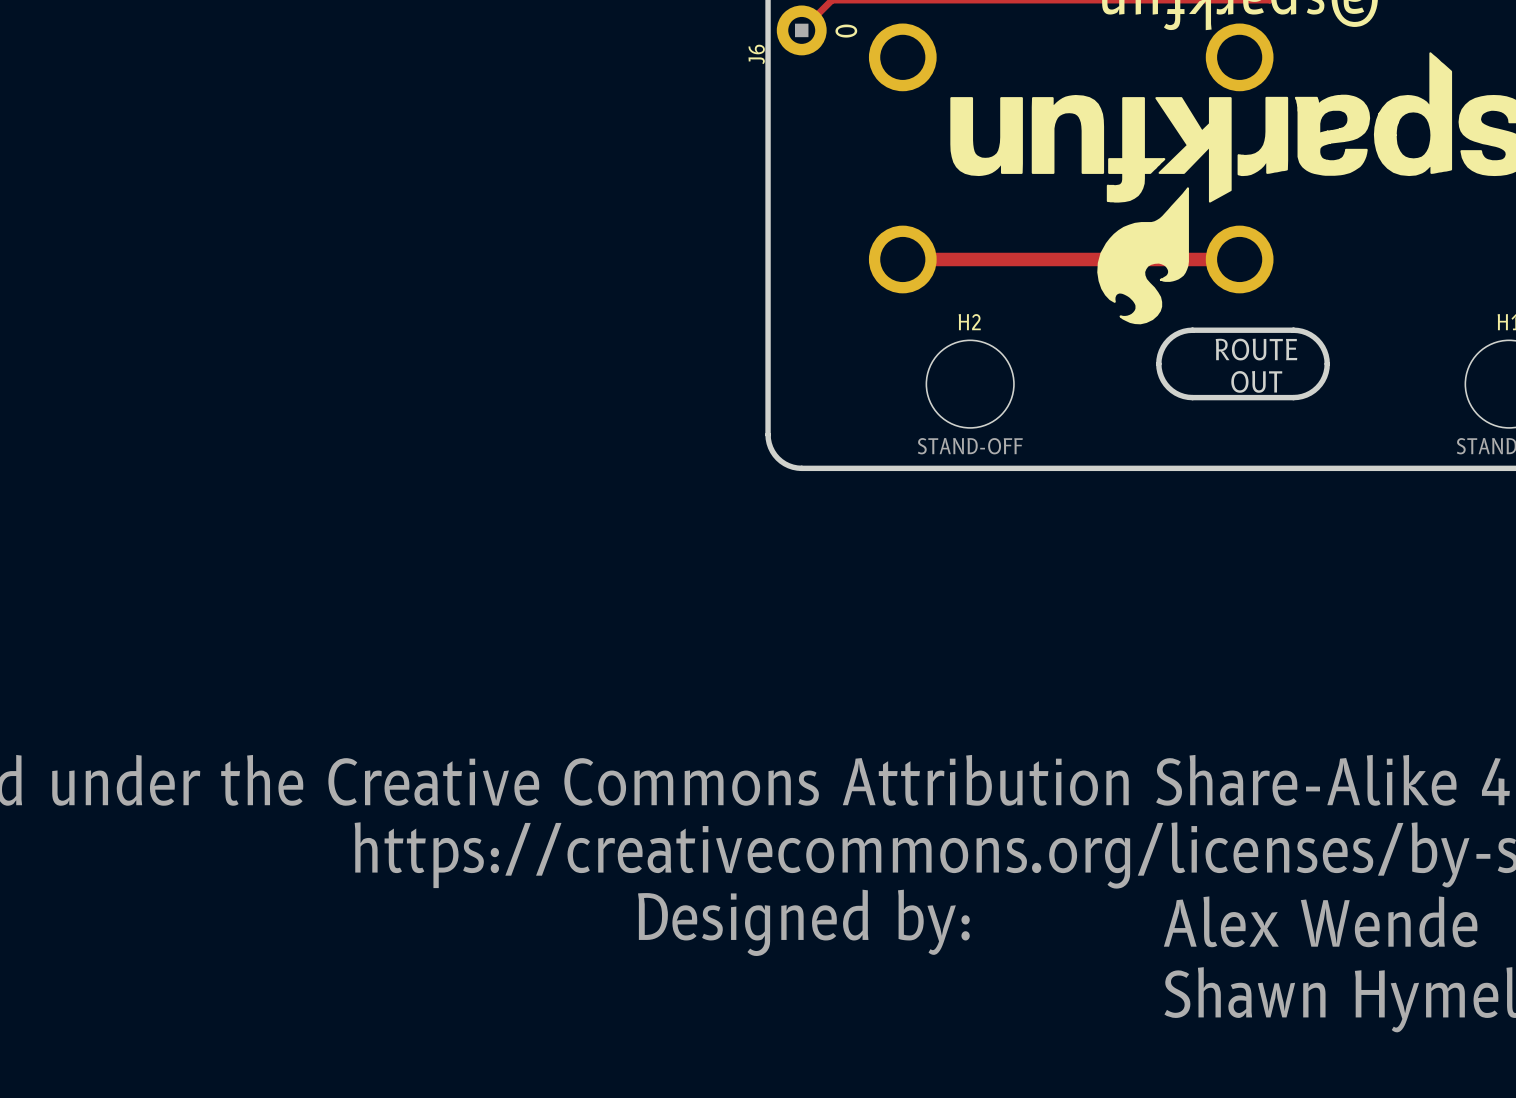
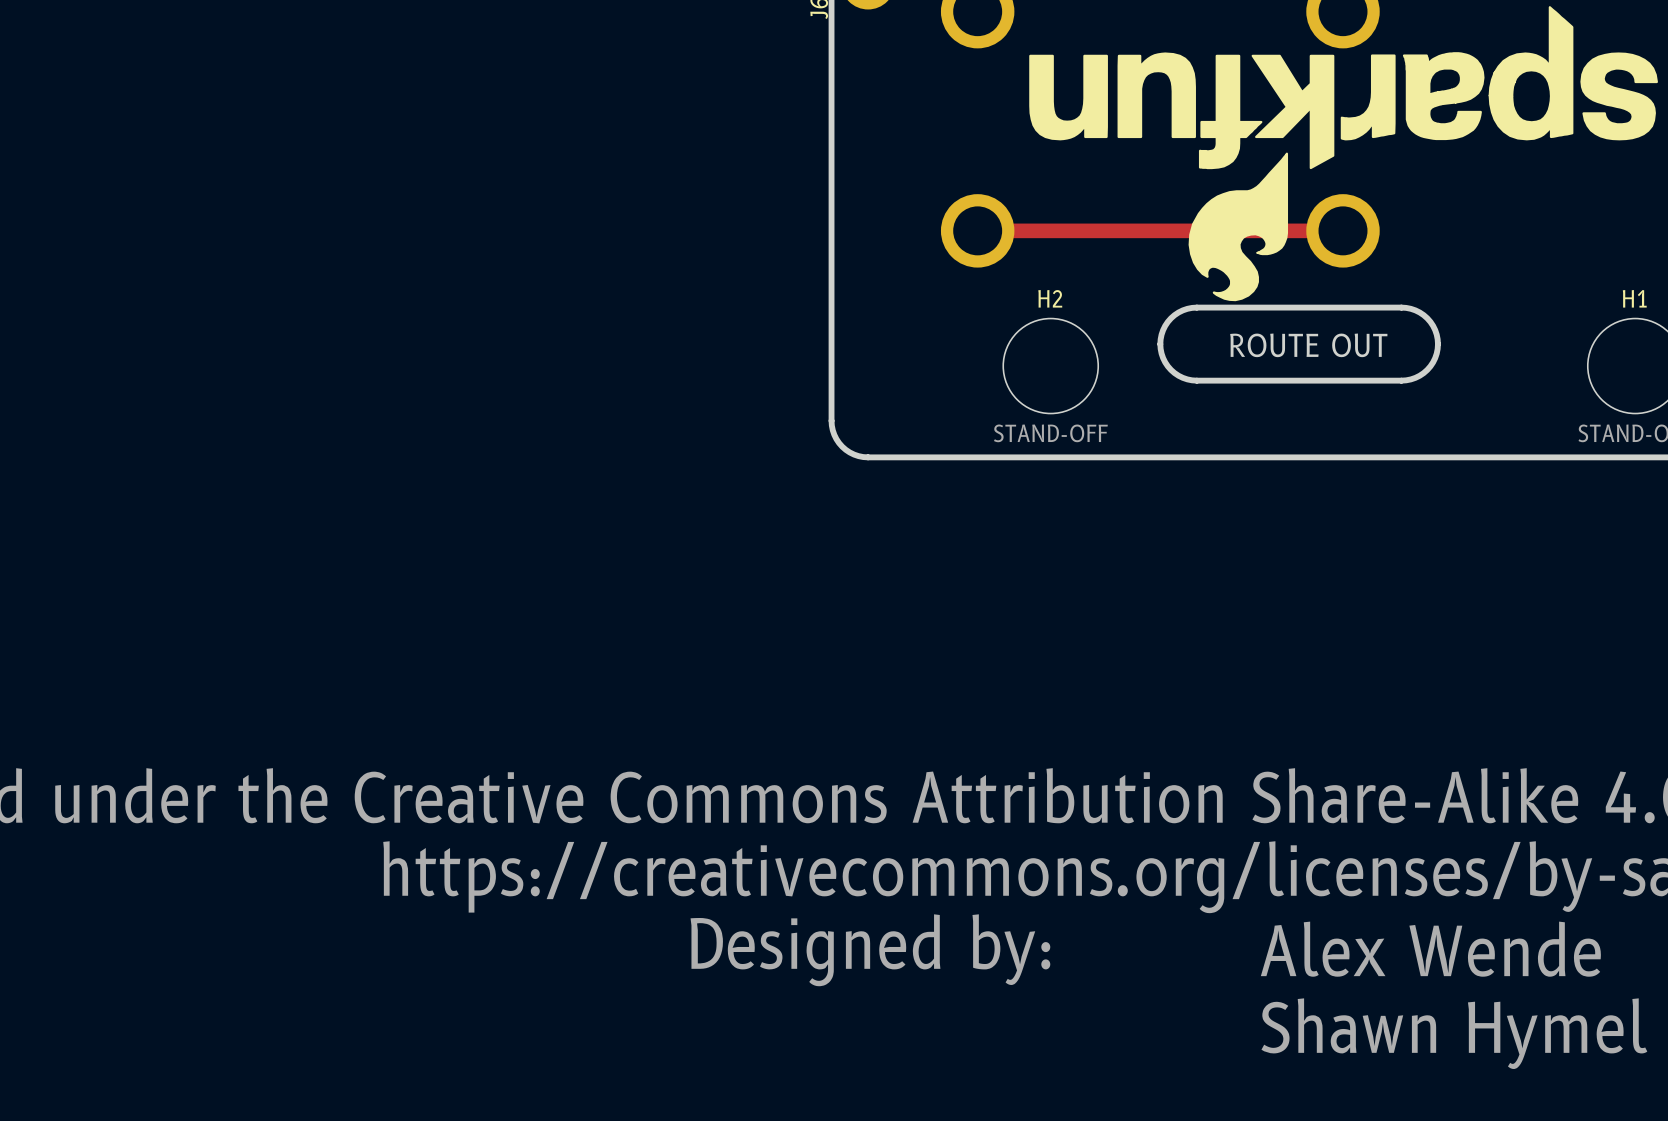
board edge: (1192, 330) (1179, 332) (1168, 340) (1161, 351) (1158, 363) (1161, 376) (1168, 387) (1179, 395) (1192, 397) -> (1291, 307) (1187, 308) (1178, 312) (1167, 321) (1161, 334) (1160, 344) (1161, 353) (1167, 366) (1178, 375) (1187, 379) (1291, 380)
text: ROUTE (1256, 349) -> ROUTE OUT (1308, 345)
text: OUT (1256, 381) -> none

